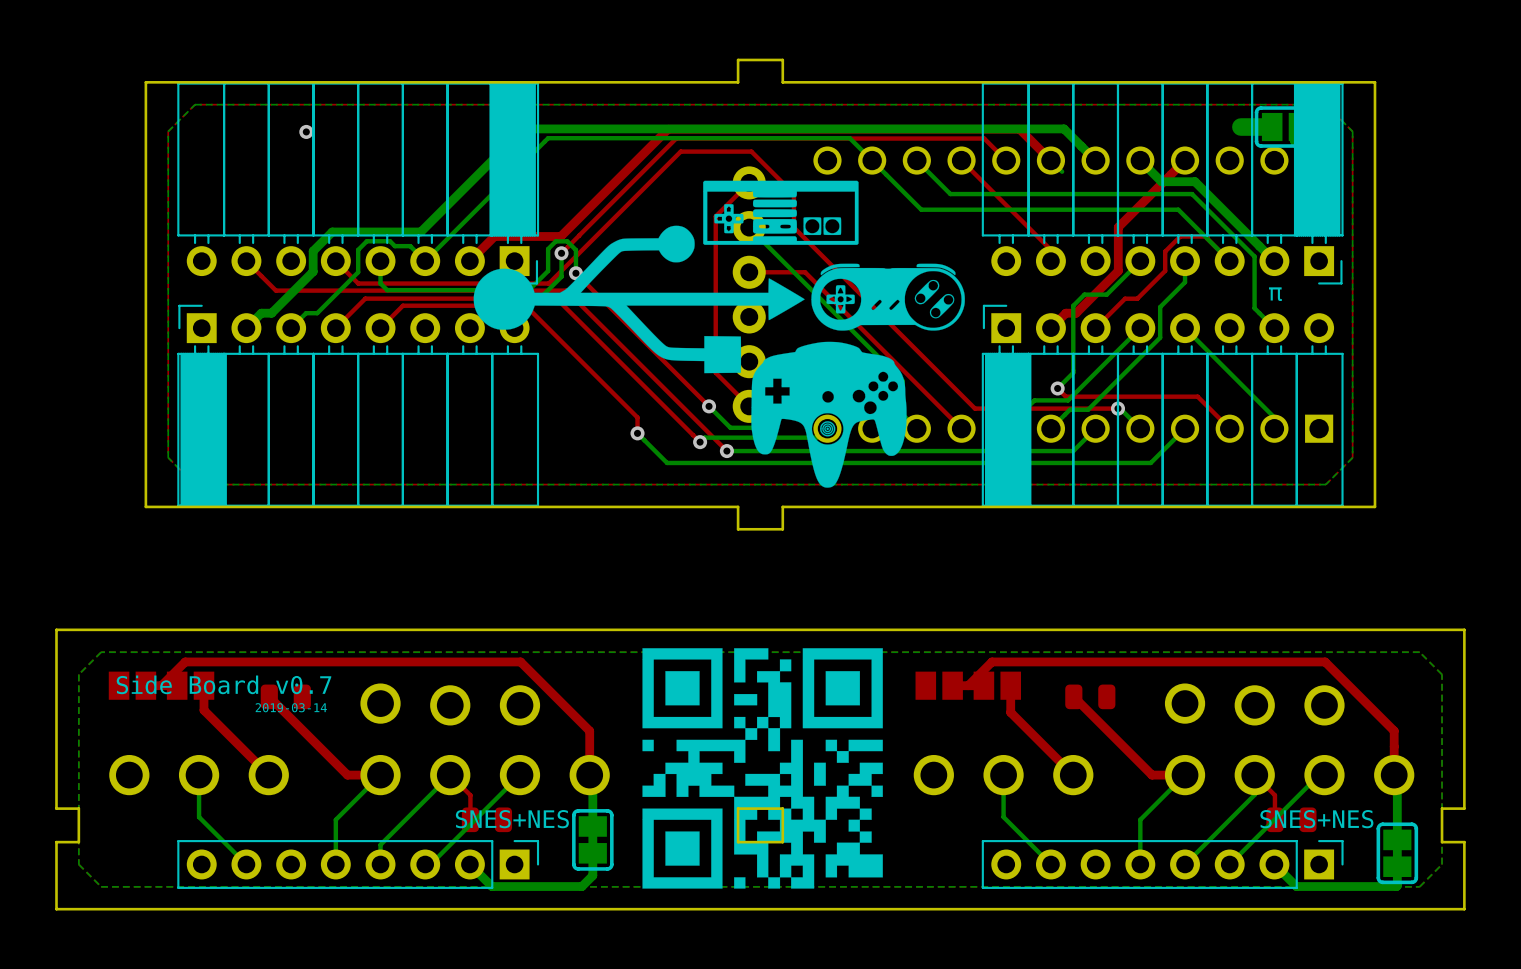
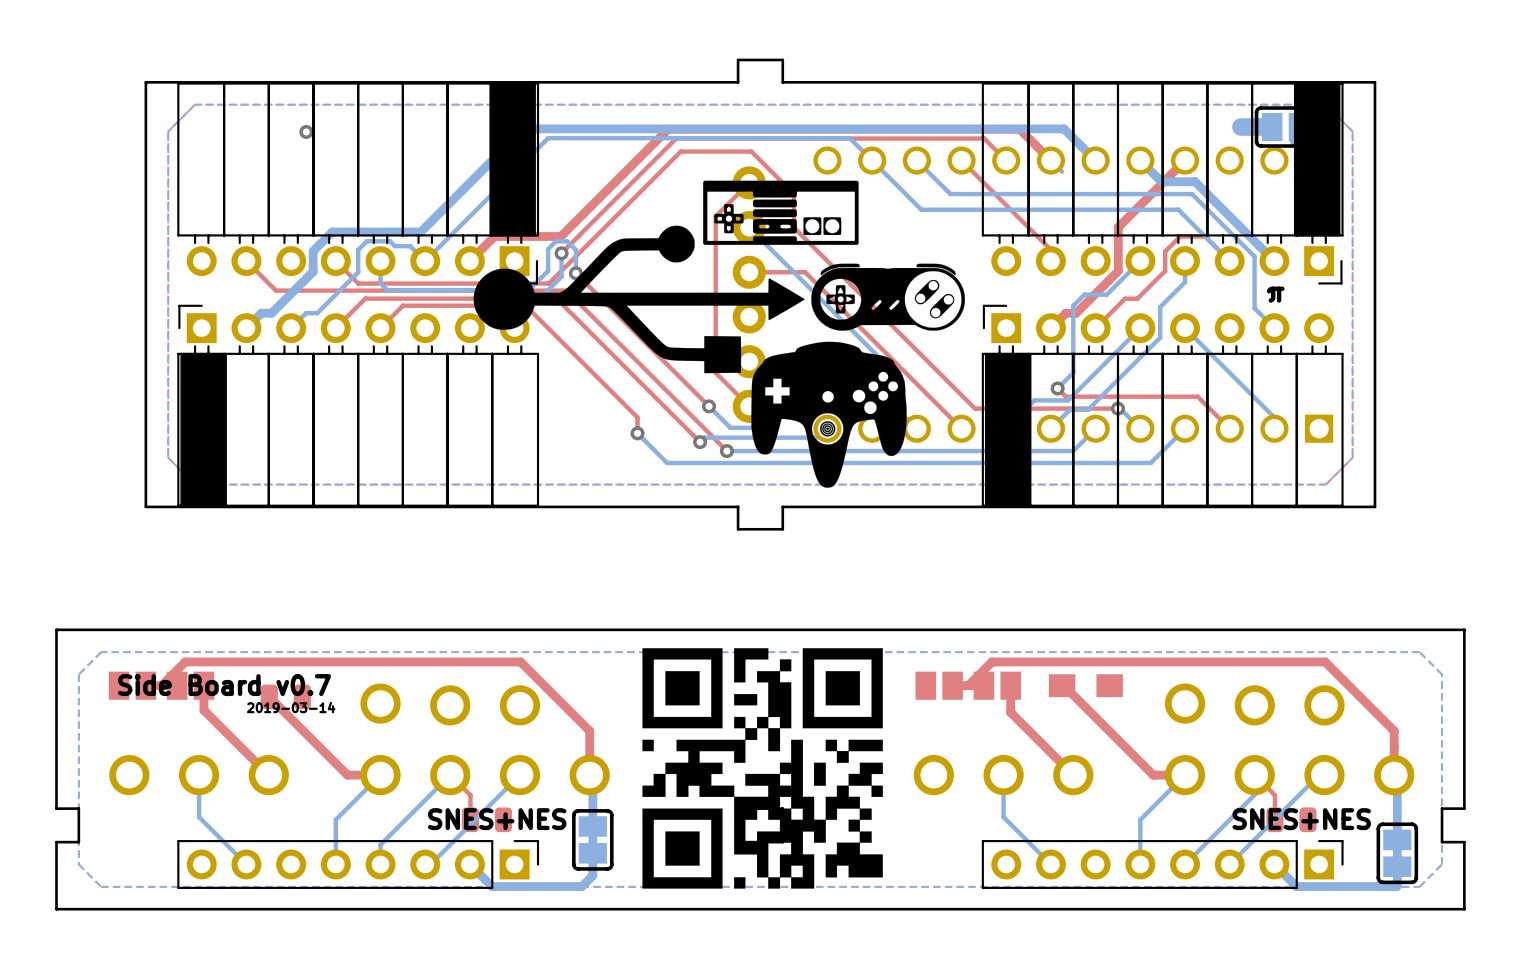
part footprint: [1065, 684, 1116, 710] -> [1048, 674, 1123, 698]
top track: (1073, 696) (1153, 775) -> (1062, 685) (1153, 775)

